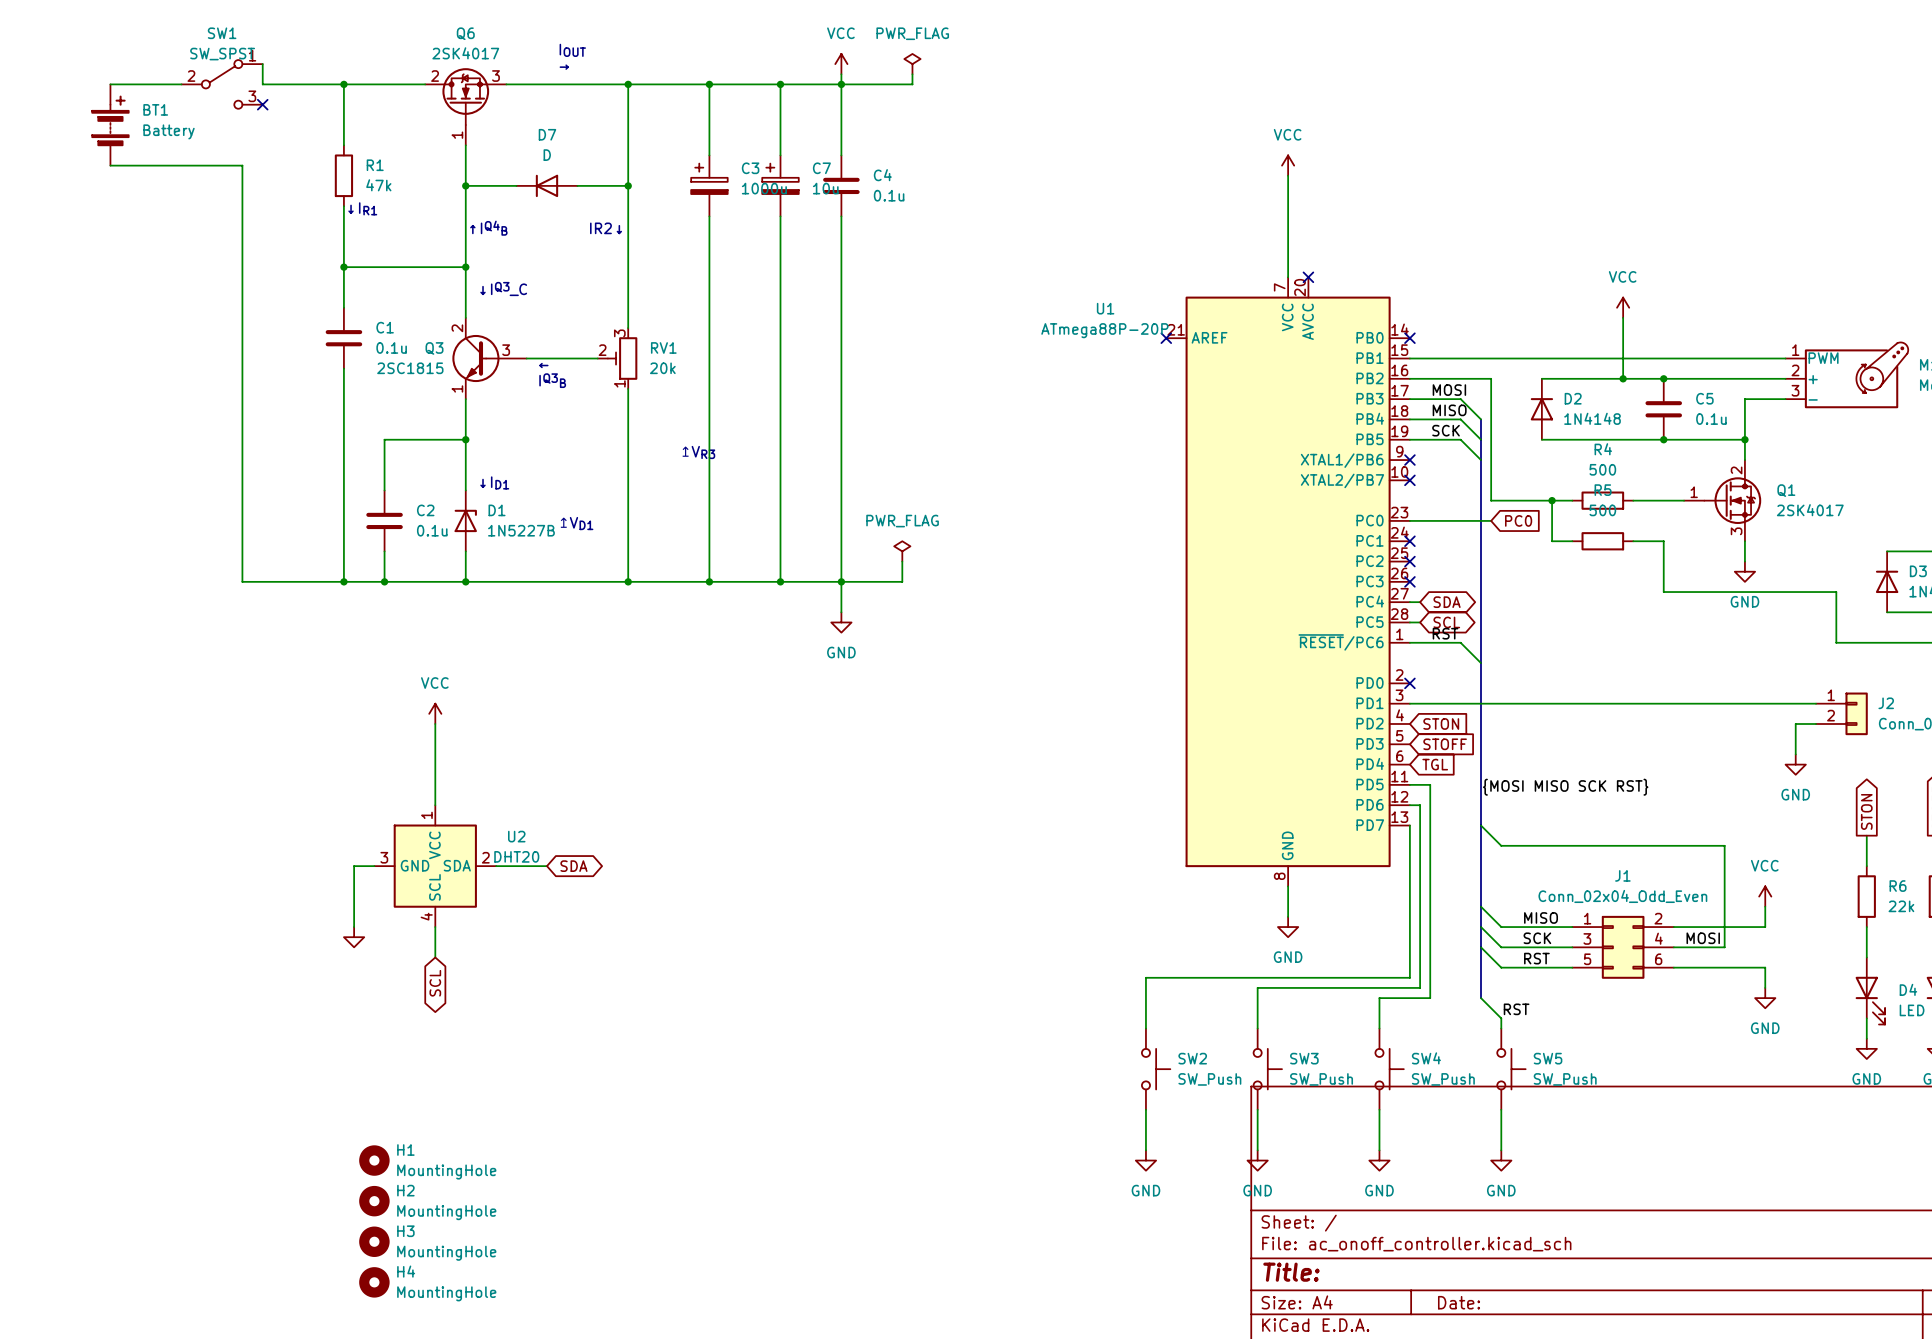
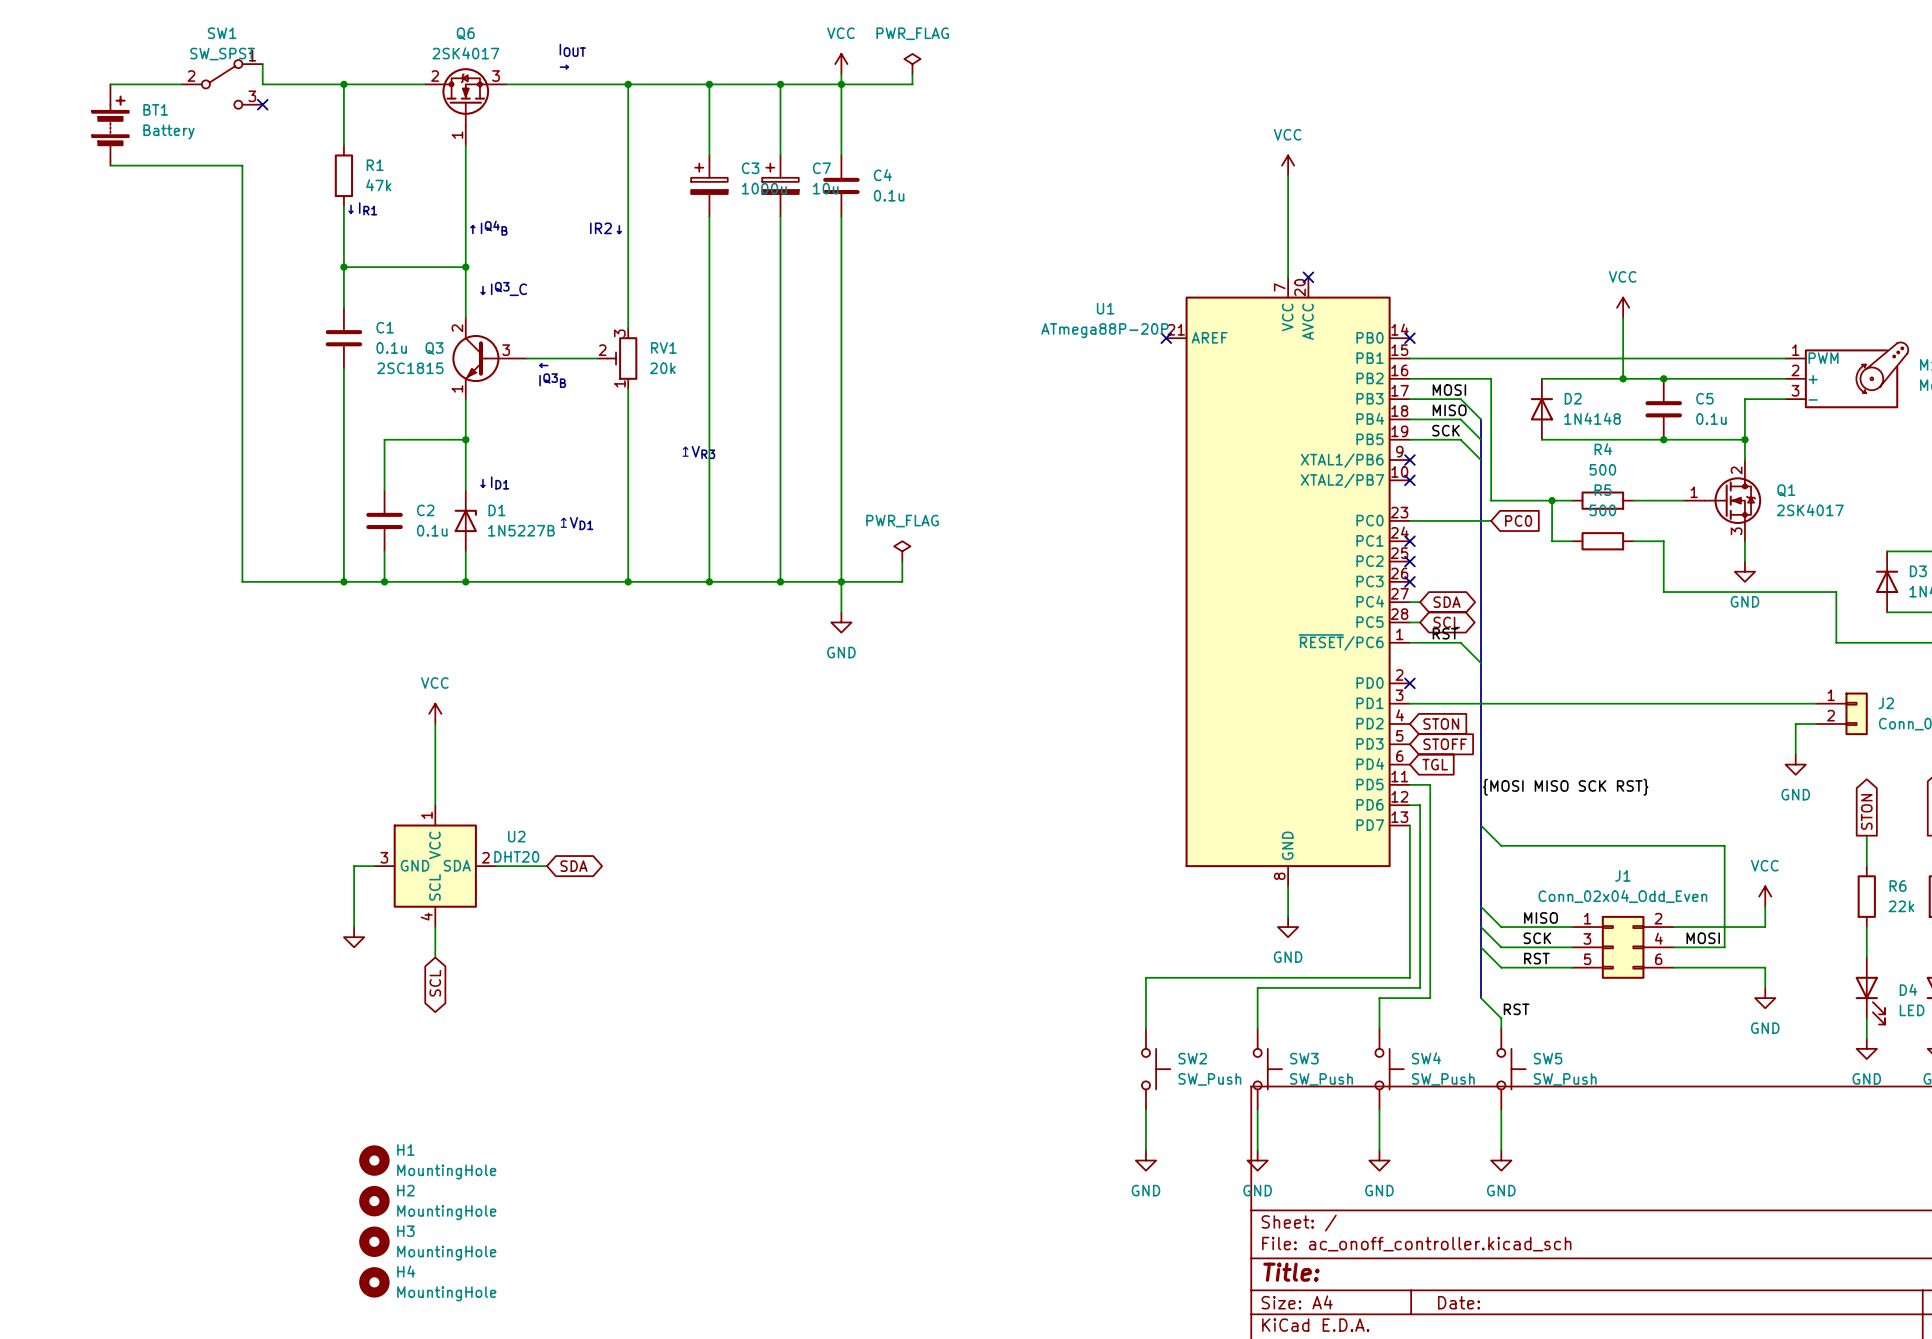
wire: (465, 185) (516, 185) -> none
junction: (465, 185) -> none
D7: D (546, 185) -> none
wire: (577, 185) (628, 185) -> none
junction: (628, 185) -> none

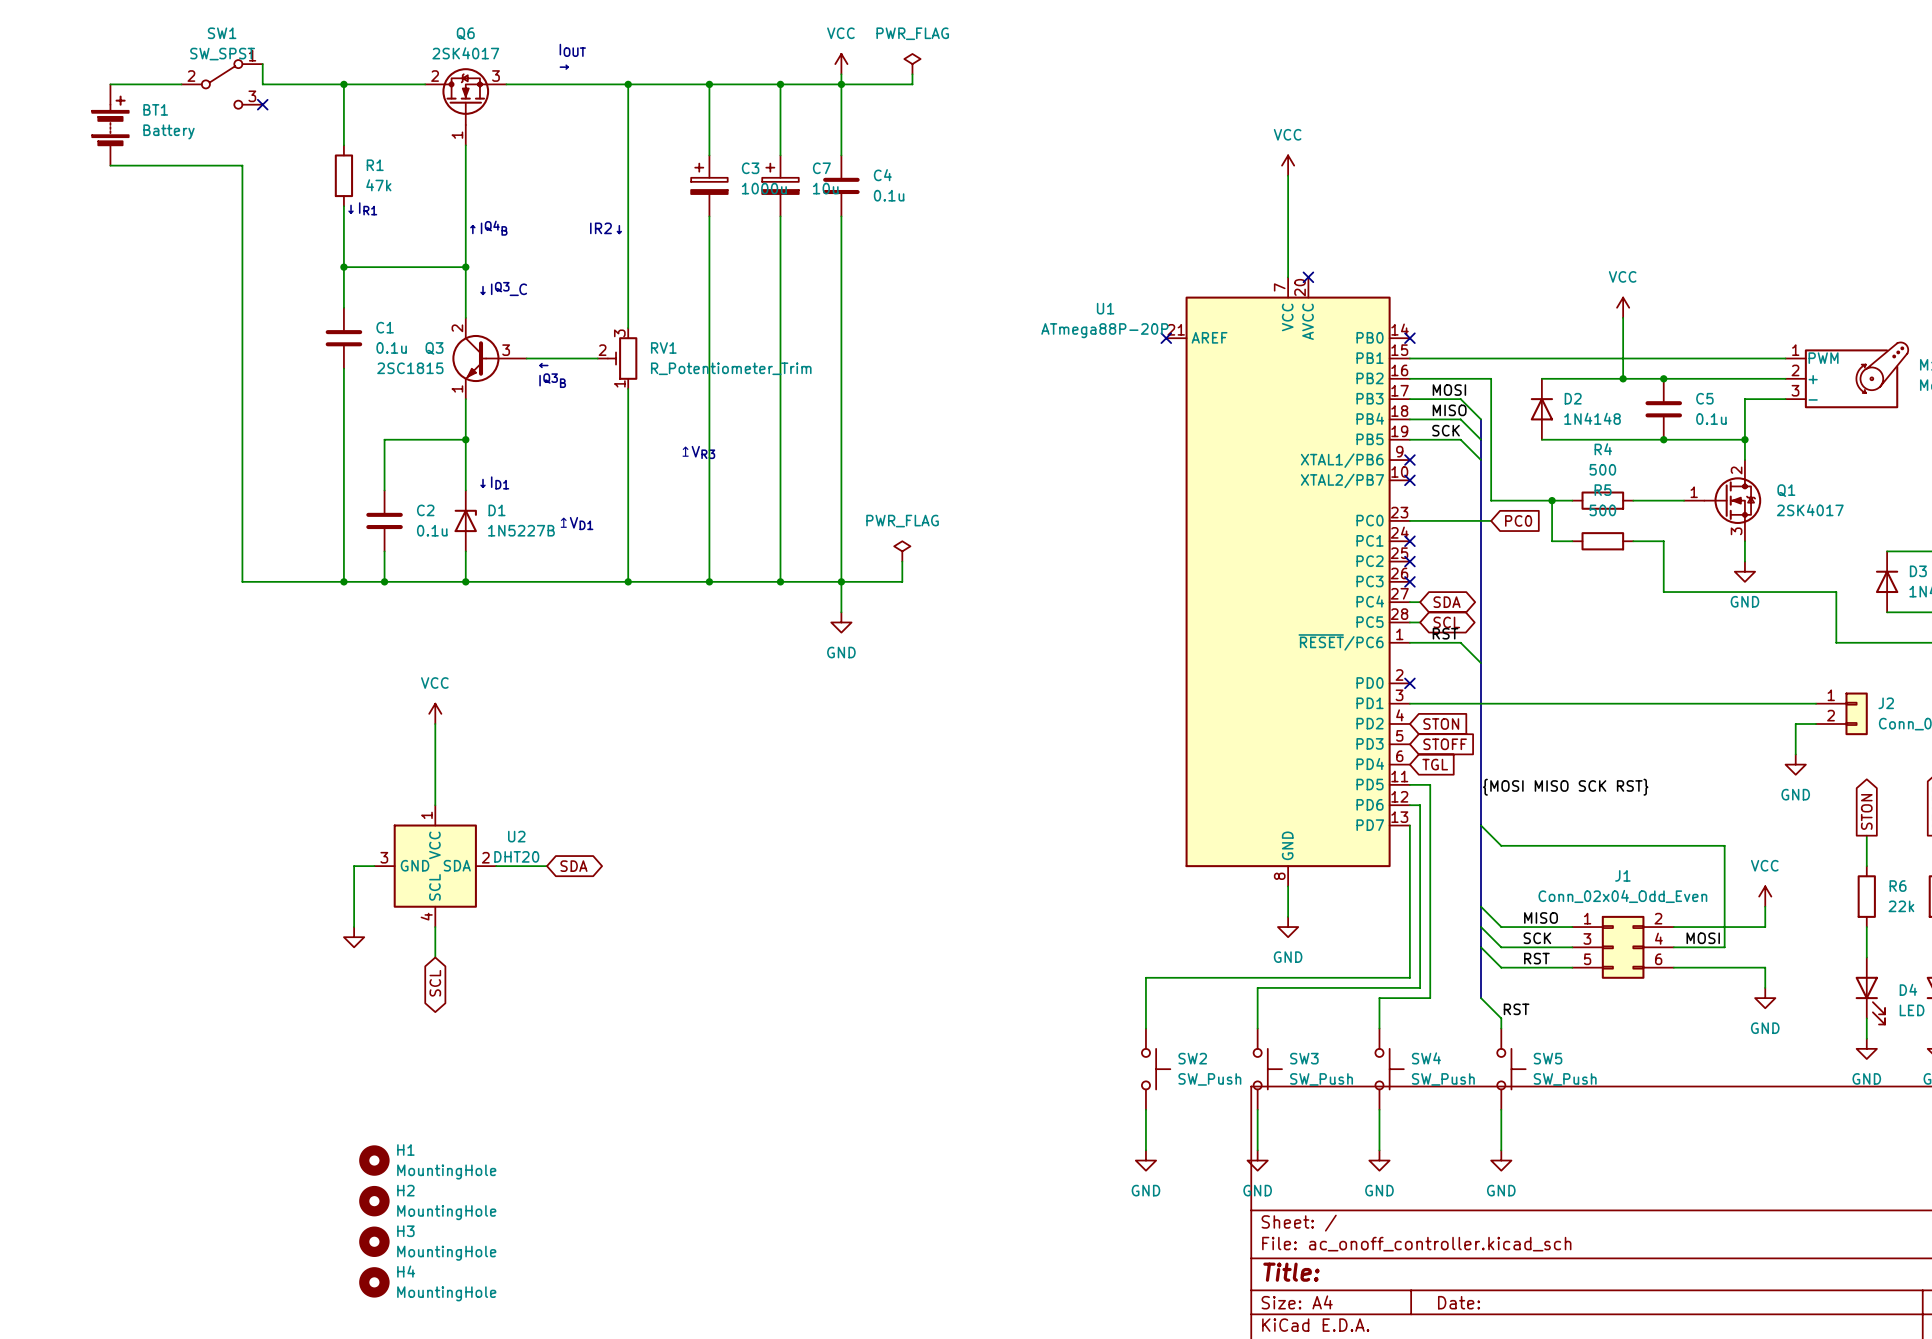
RV1 value: 20k (662, 368) -> R_Potentiometer_Trim (731, 368)

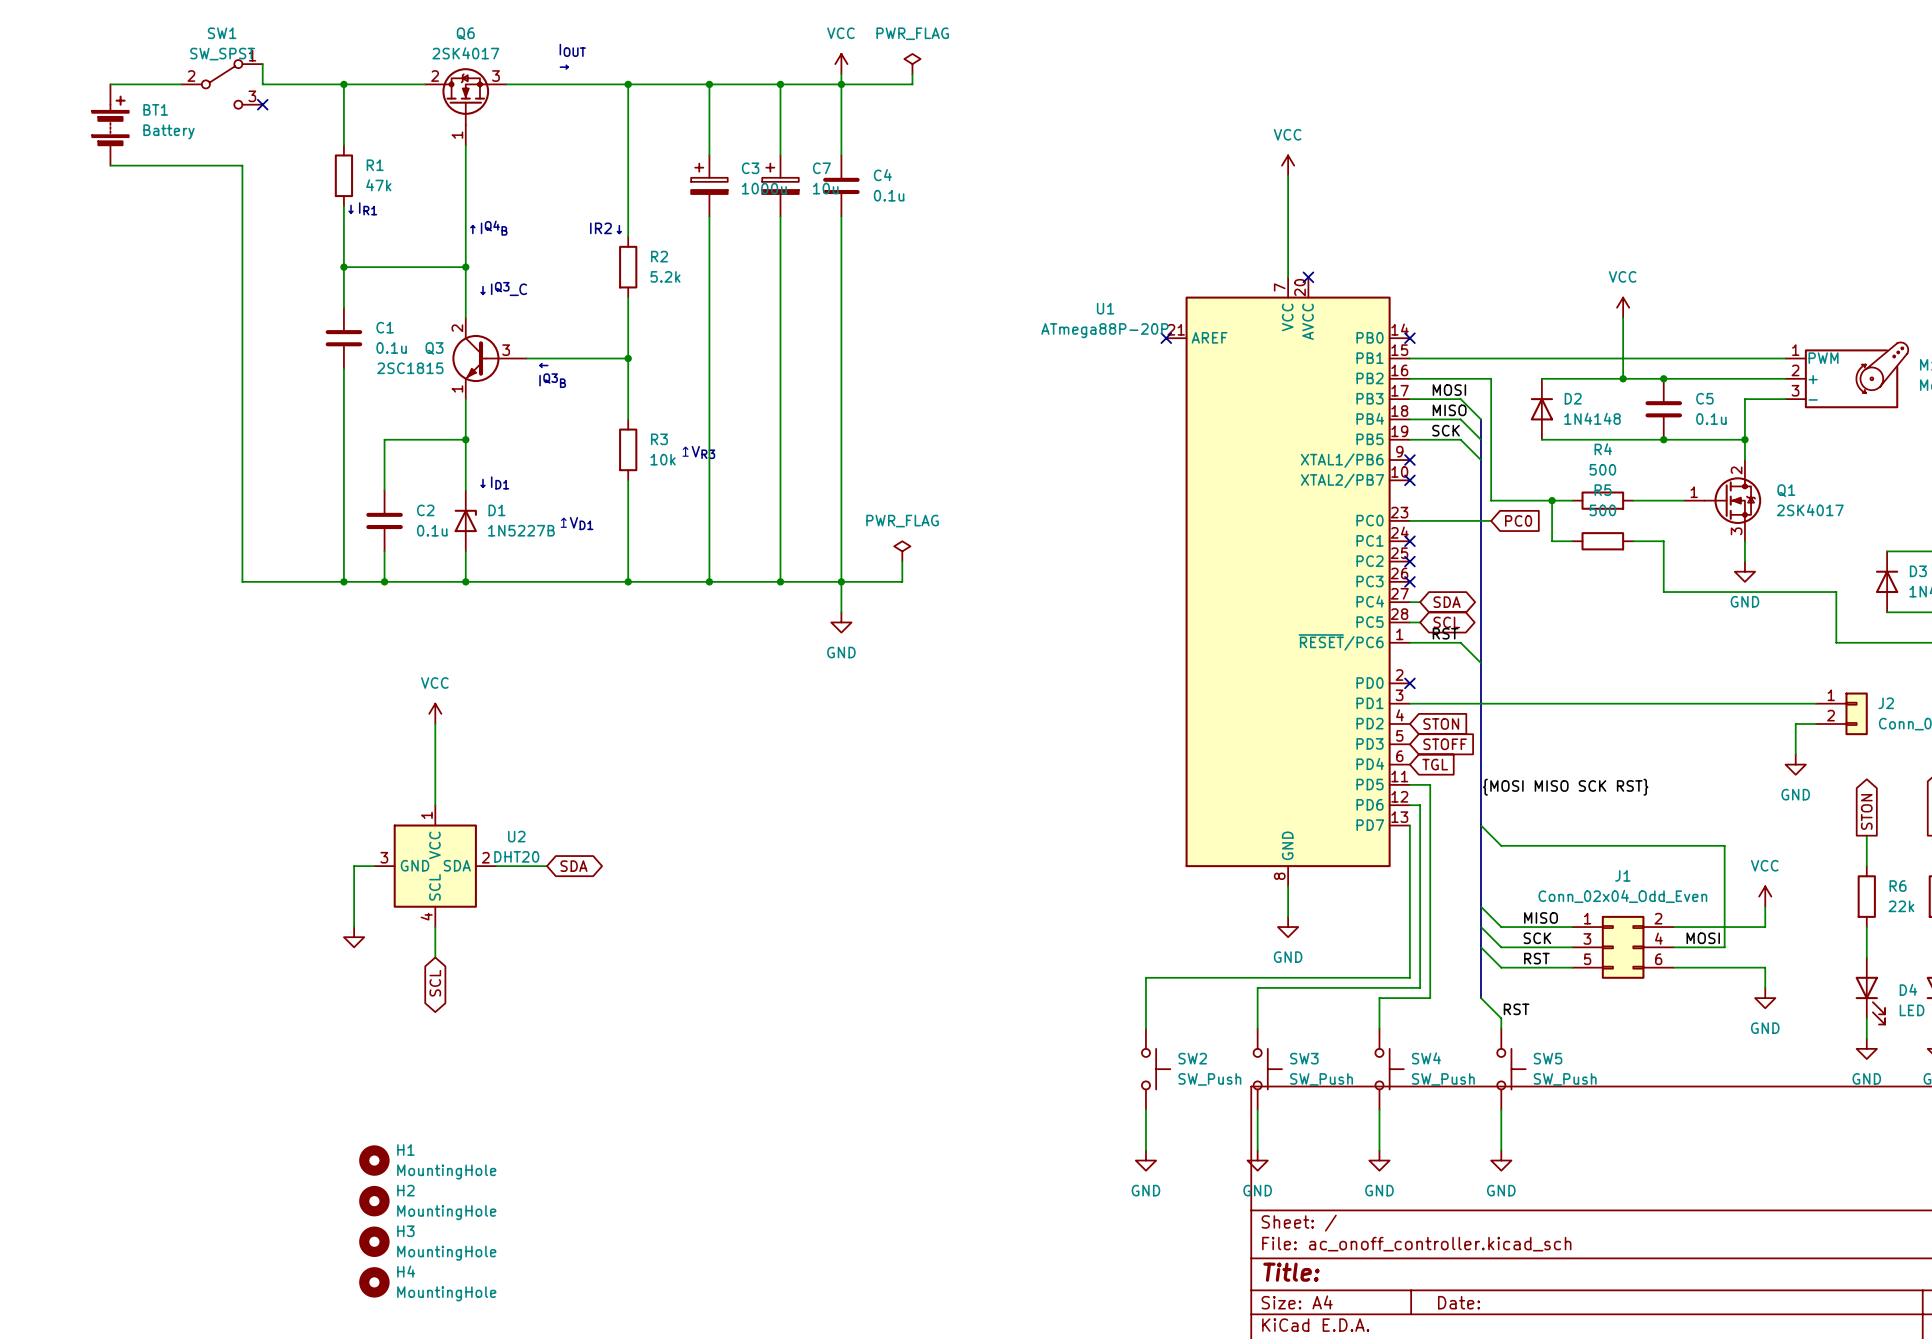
wire: (628, 236) (628, 297) -> (628, 328) (628, 388)
R2: none -> 5.2k (628, 267)
RV1: R_Potentiometer_Trim (617, 358) -> none
junction: none -> (628, 358)
wire: (628, 419) (628, 480) -> none
R3: none -> 10k (628, 449)

